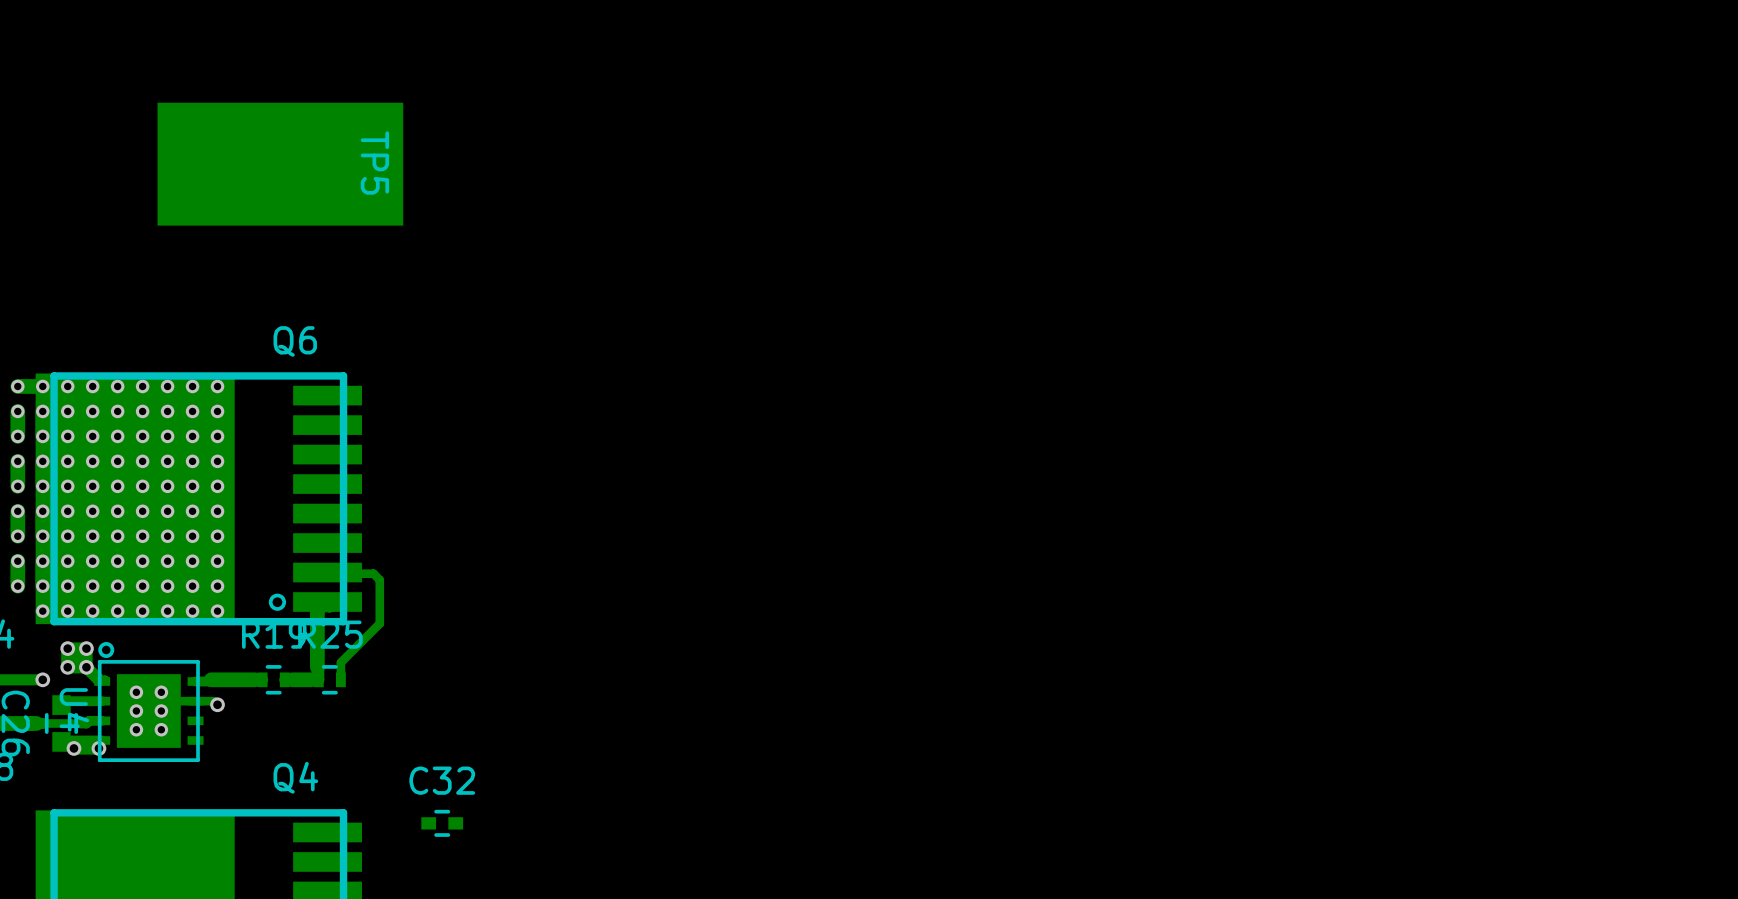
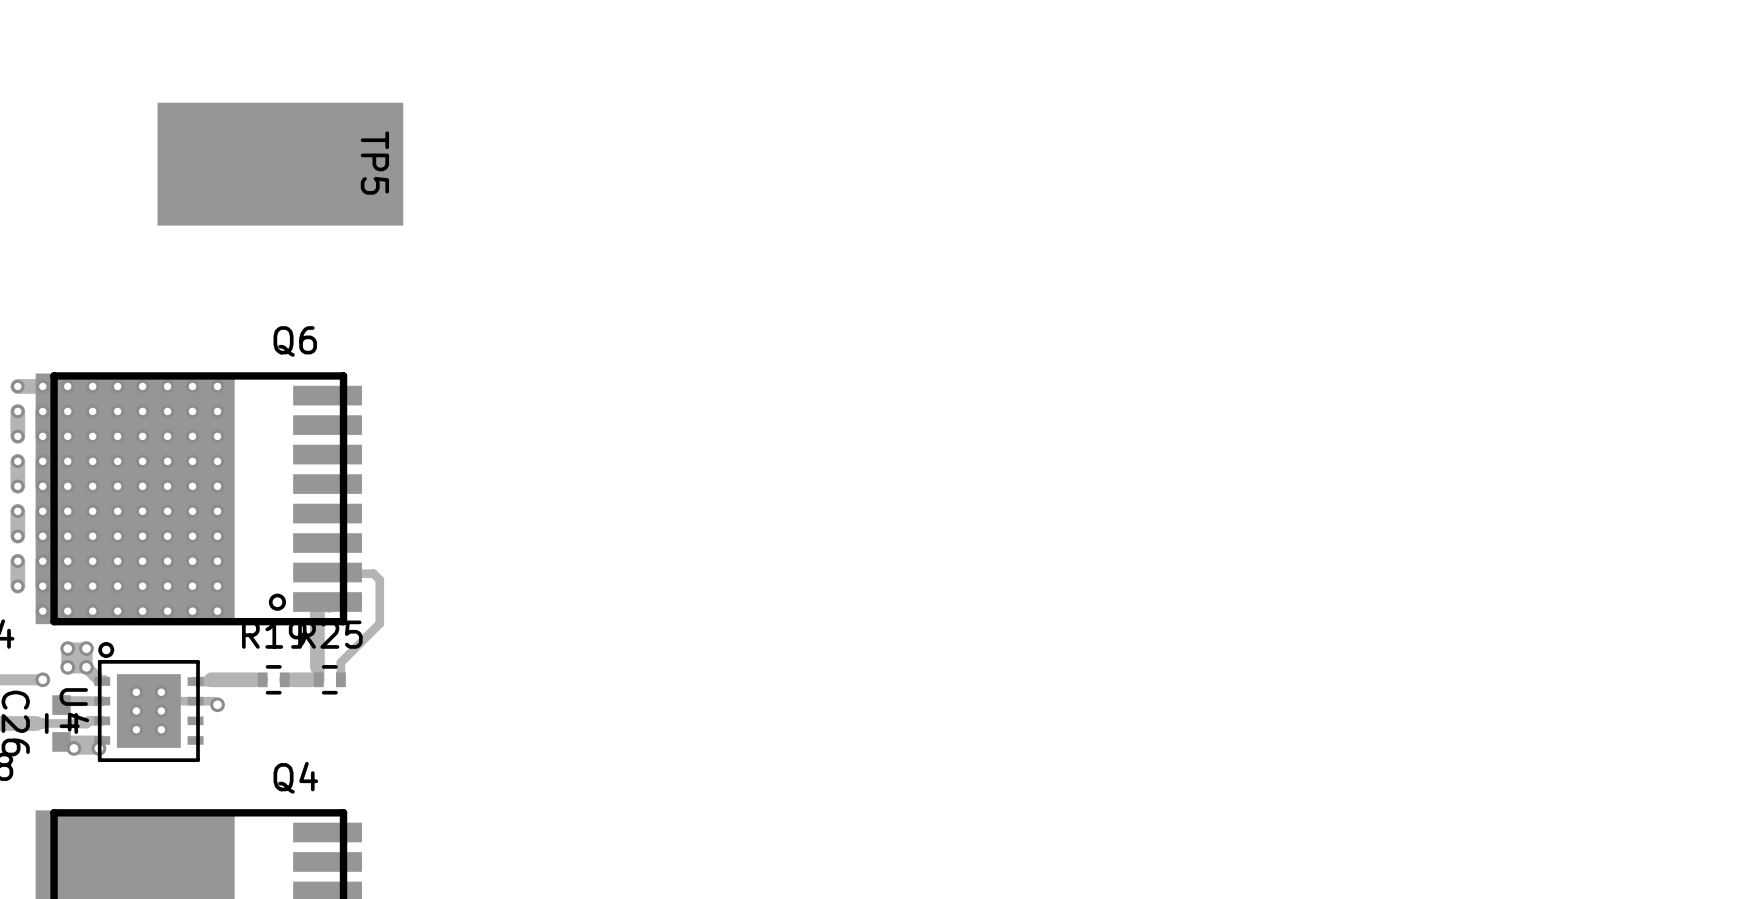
C32: (442, 823) -> none

